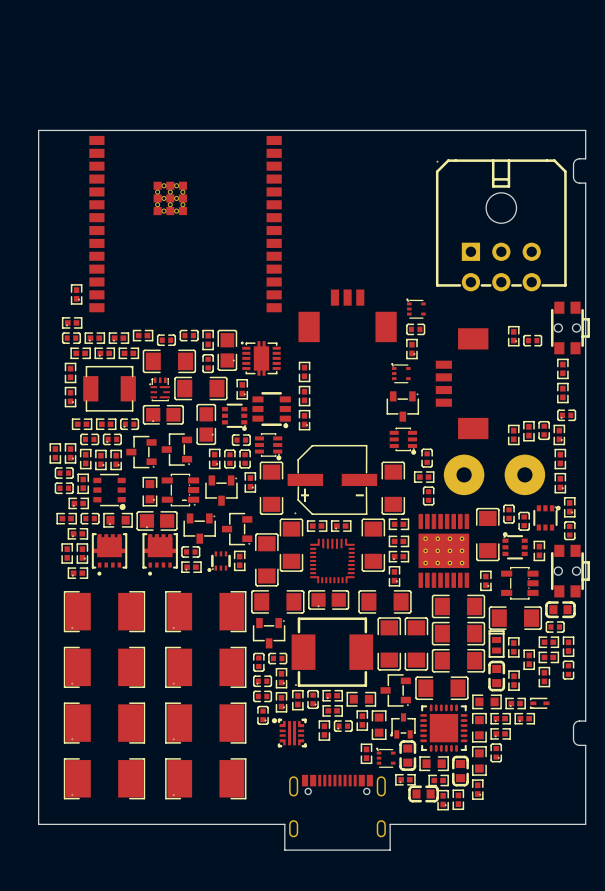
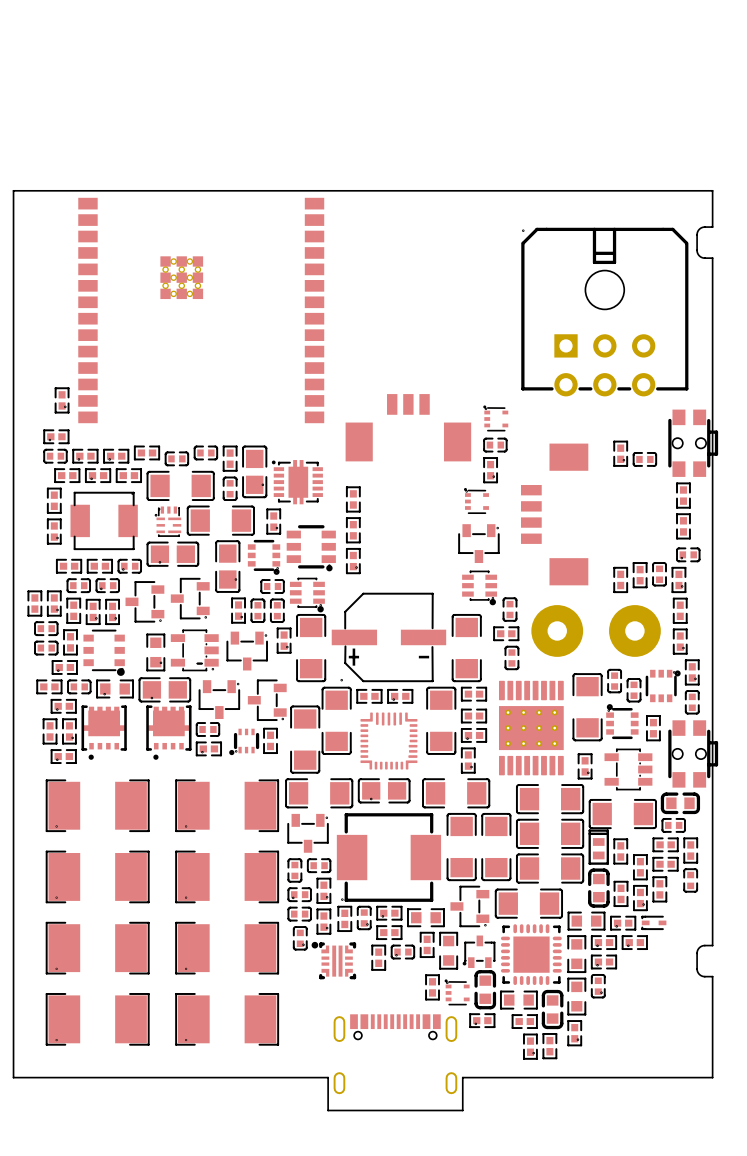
part: none -> (640, 898)
part: (423, 793) -> none

